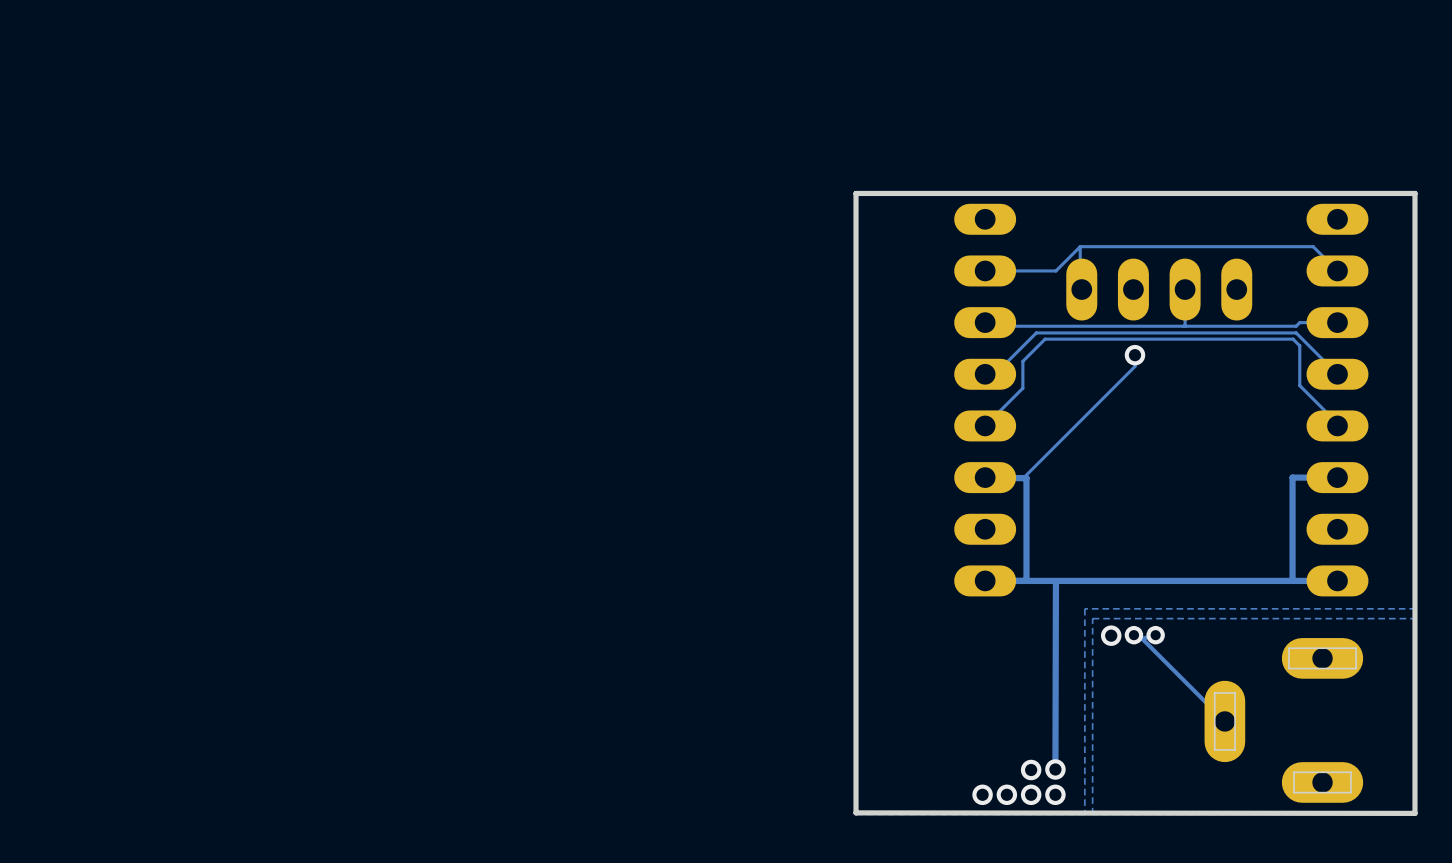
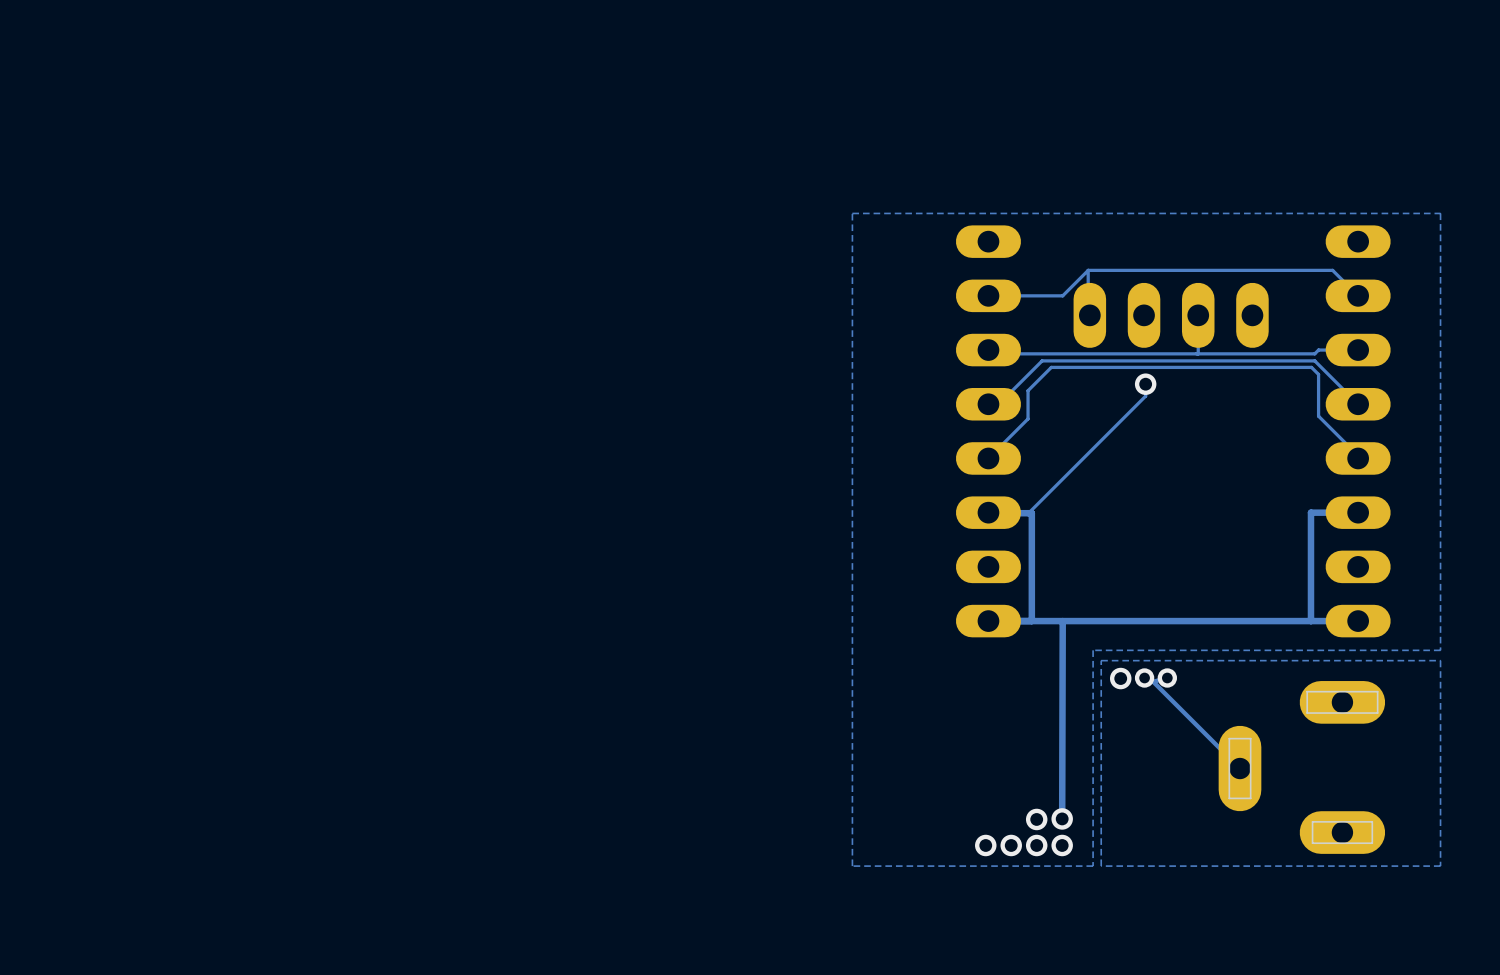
board edge: (1414, 193) (856, 193) (856, 812) (1414, 813) (1414, 193) -> none

